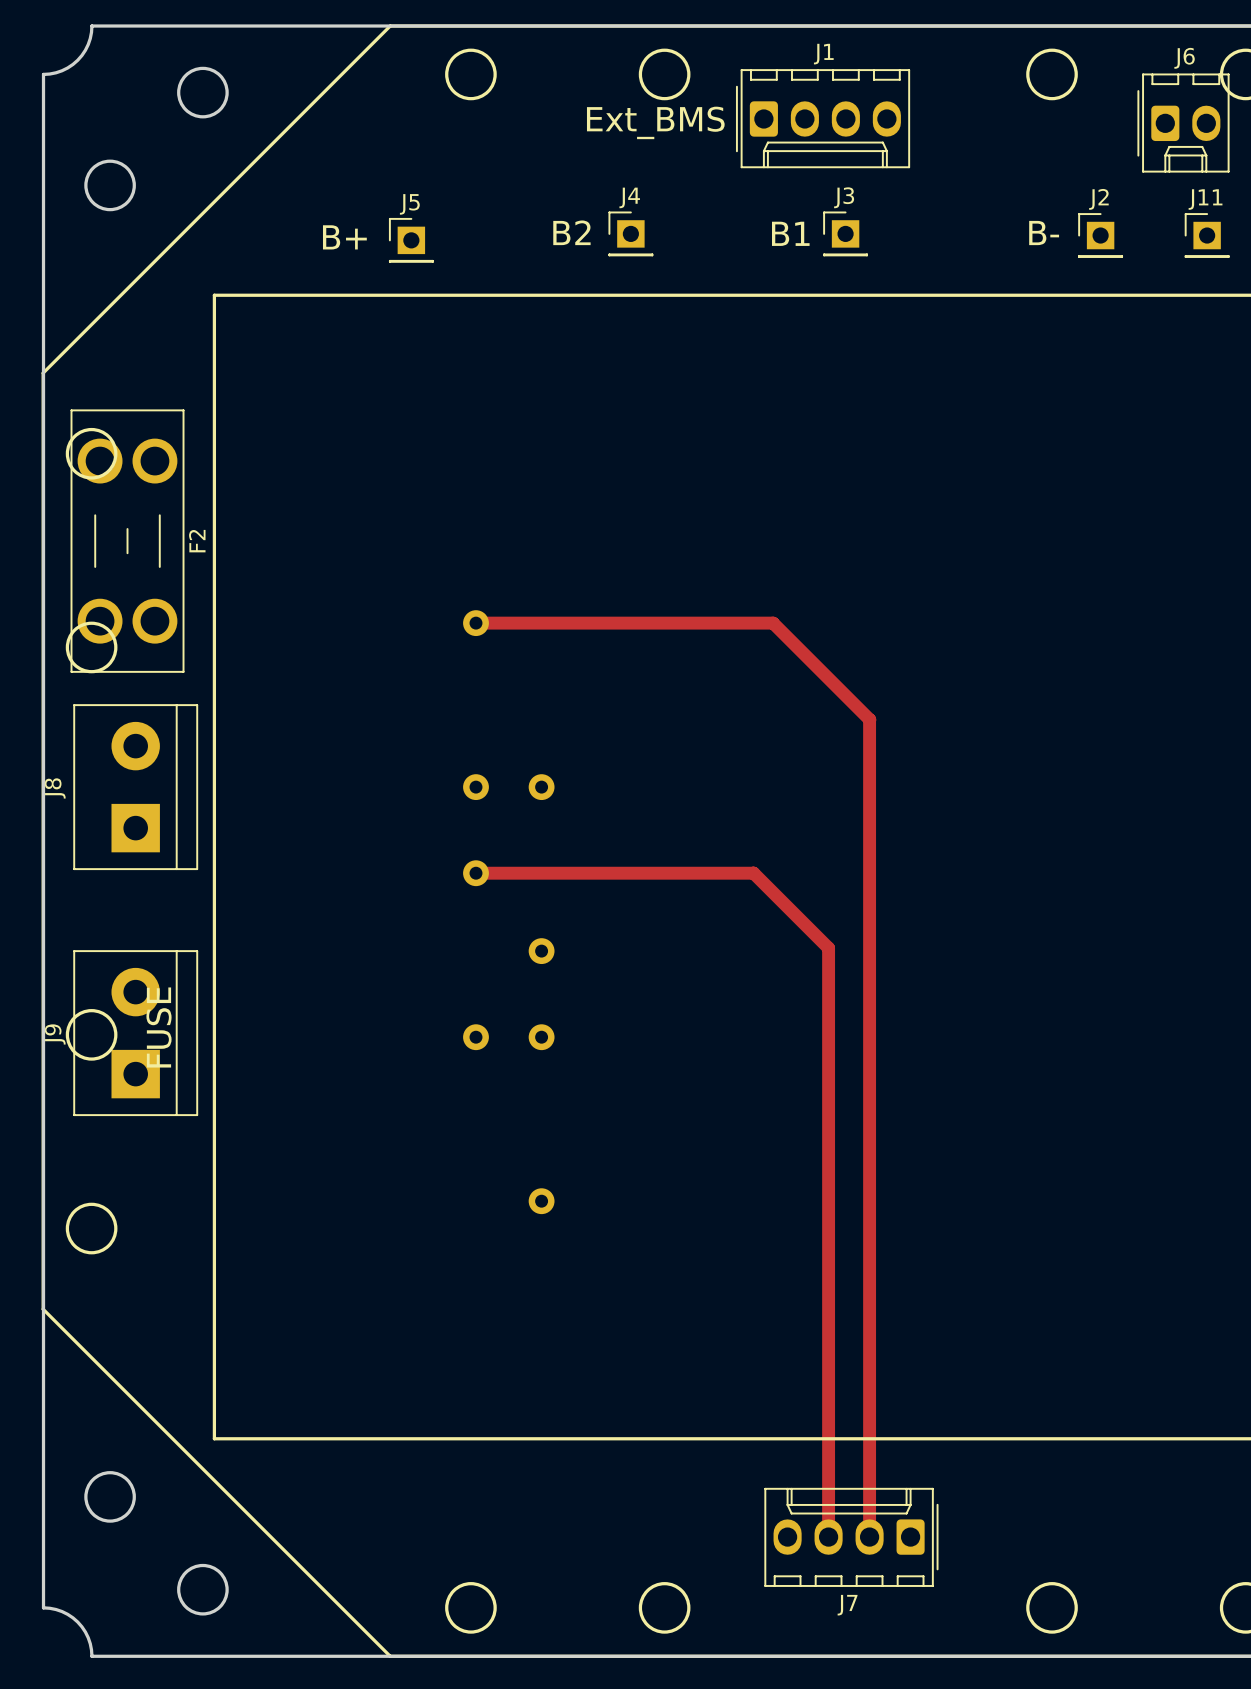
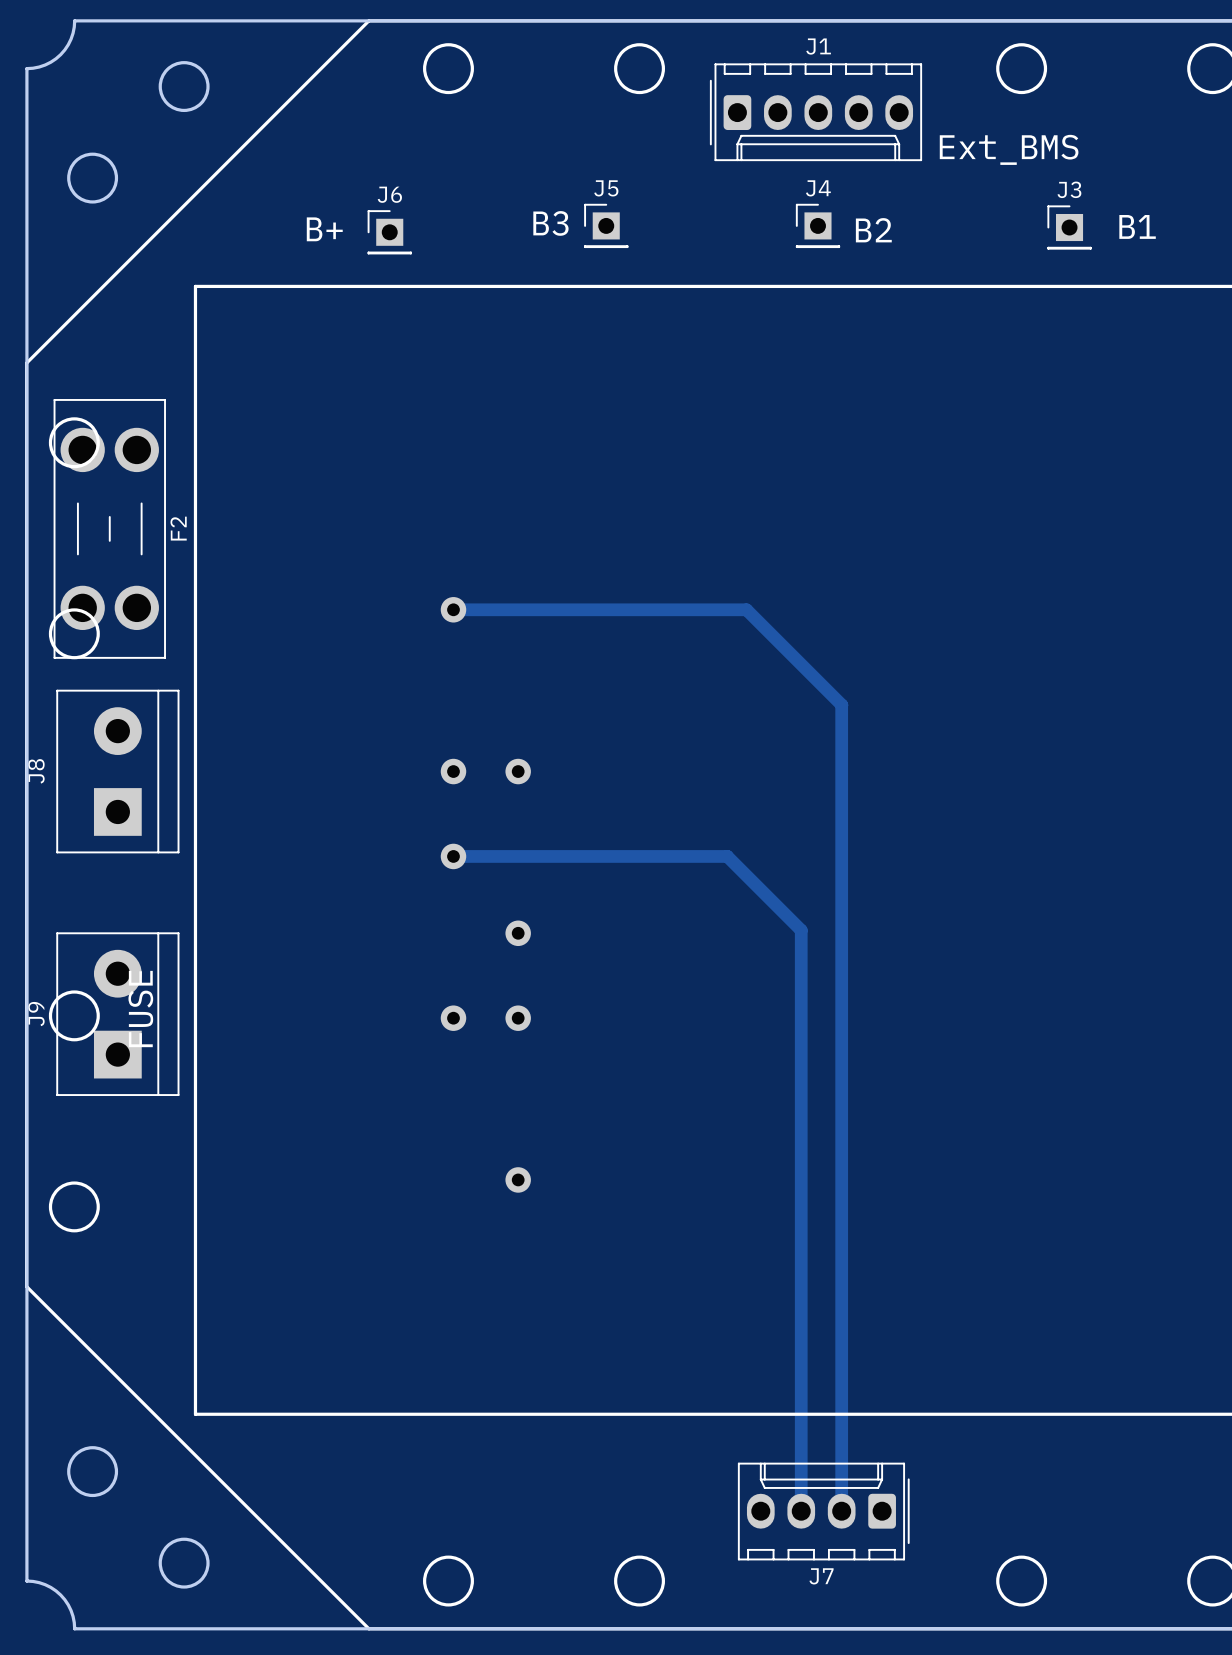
J1 footprint: [735, 69, 911, 169] -> [709, 63, 923, 162]
text position: Ext_BMS (655, 122) -> Ext_BMS (1009, 149)
J6: (1183, 123) -> none
J4 name: J4 (629, 197) -> J5 (606, 188)
J3 name: J3 (844, 197) -> J4 (818, 188)
J2 name: J2 (1098, 199) -> J3 (1069, 189)
J5 name: J5 (409, 204) -> J6 (389, 194)
text: B2 (571, 232) -> B3 (550, 223)
text position: B1 (790, 233) -> B1 (1137, 226)
text: B- (1044, 233) -> none
J11: (1207, 235) -> none
text: none -> B2 (873, 230)

